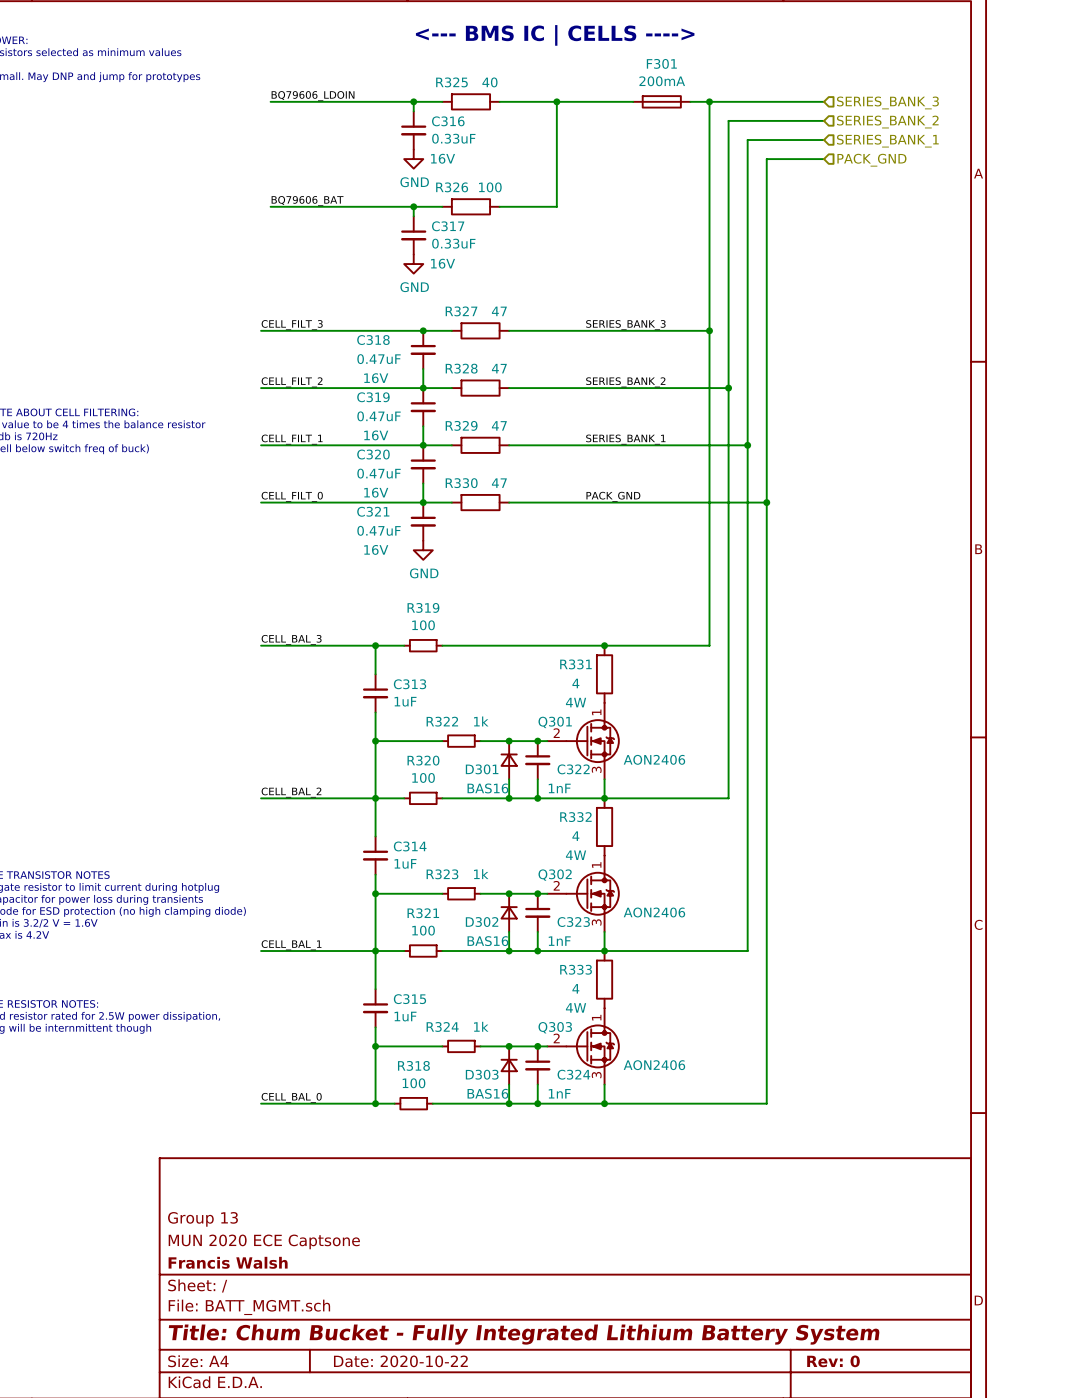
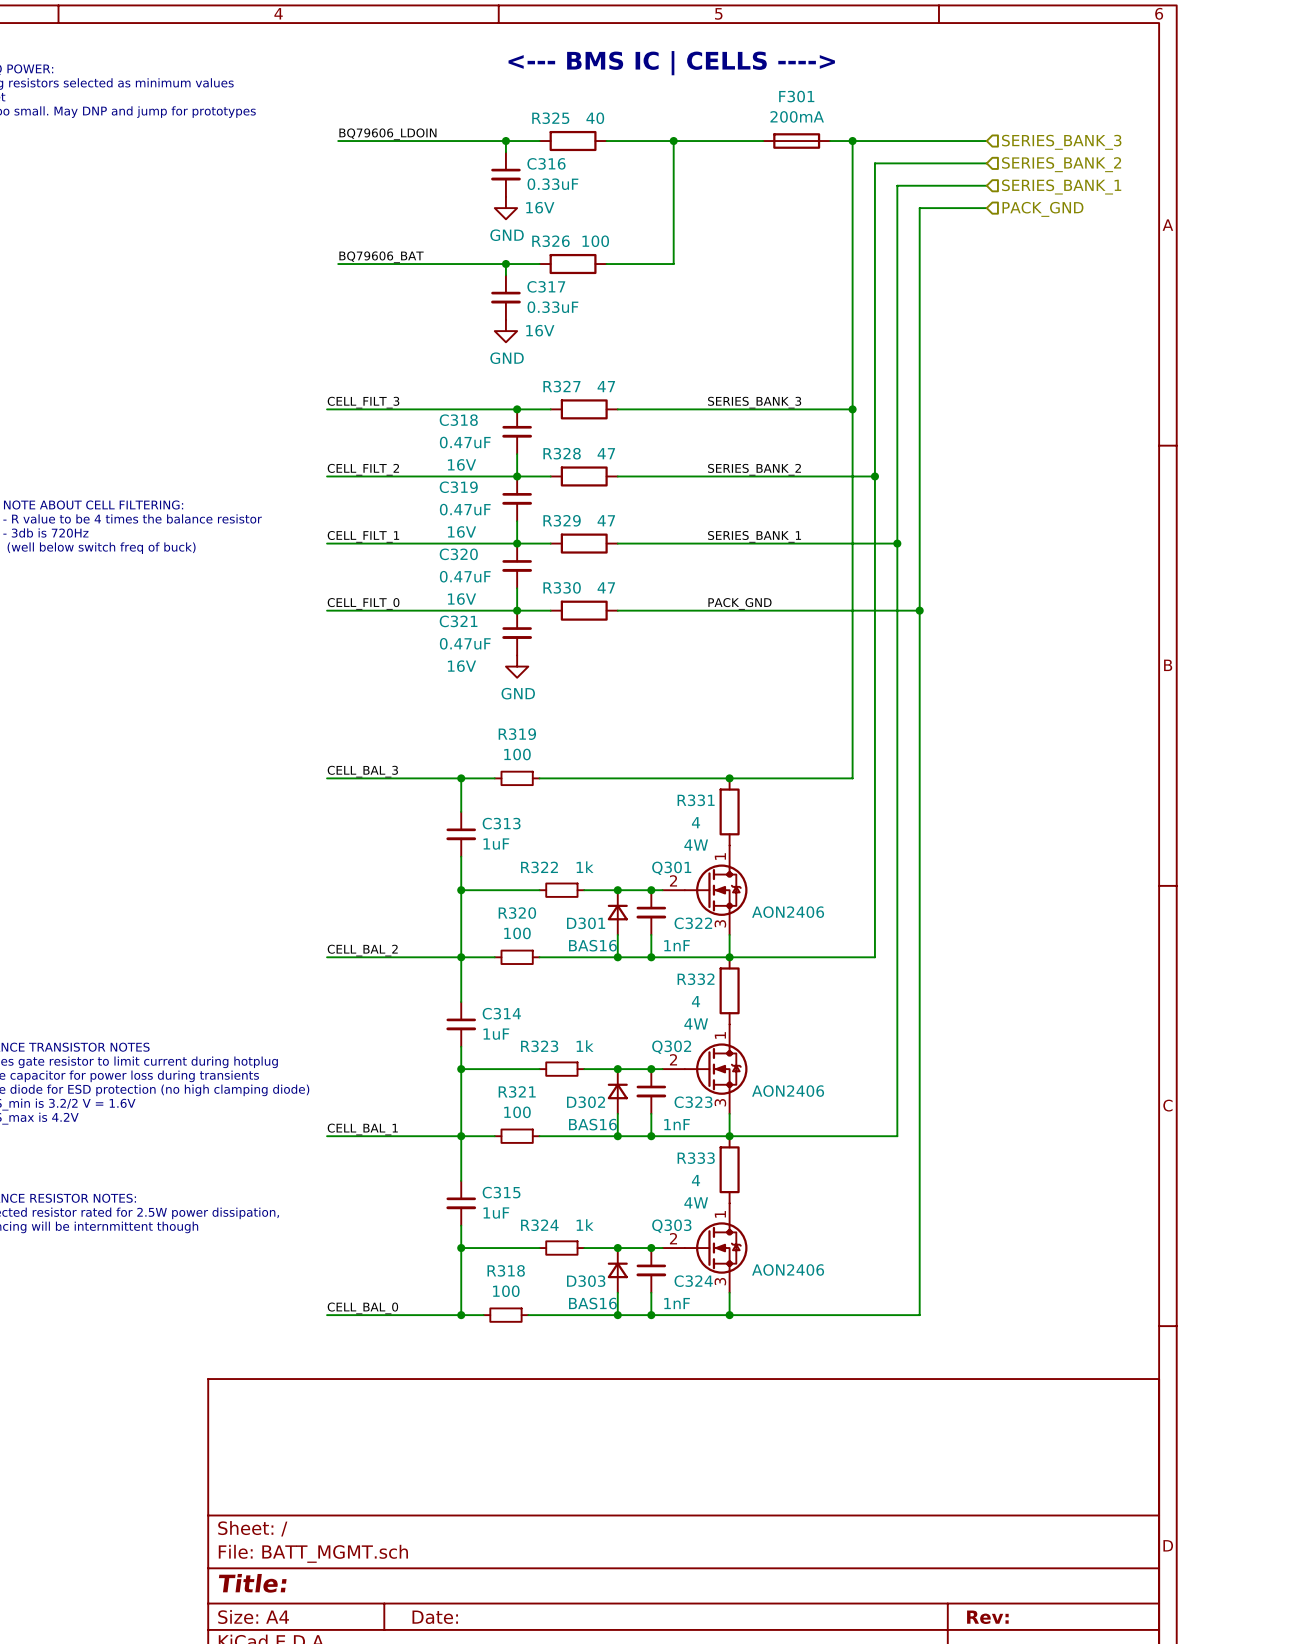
title block: Group 13 (202, 1219) -> none
title block: MUN 2020 ECE Captsone (264, 1241) -> none
title block: Francis Walsh (228, 1262) -> none
title block: Title: Chum Bucket - Fully Integrated Lithium Battery System (524, 1334) -> Title: (252, 1583)
title block: Date: 2020-10-22 (400, 1361) -> Date: (435, 1617)
title block: Rev: 0 (833, 1361) -> Rev: (987, 1617)

